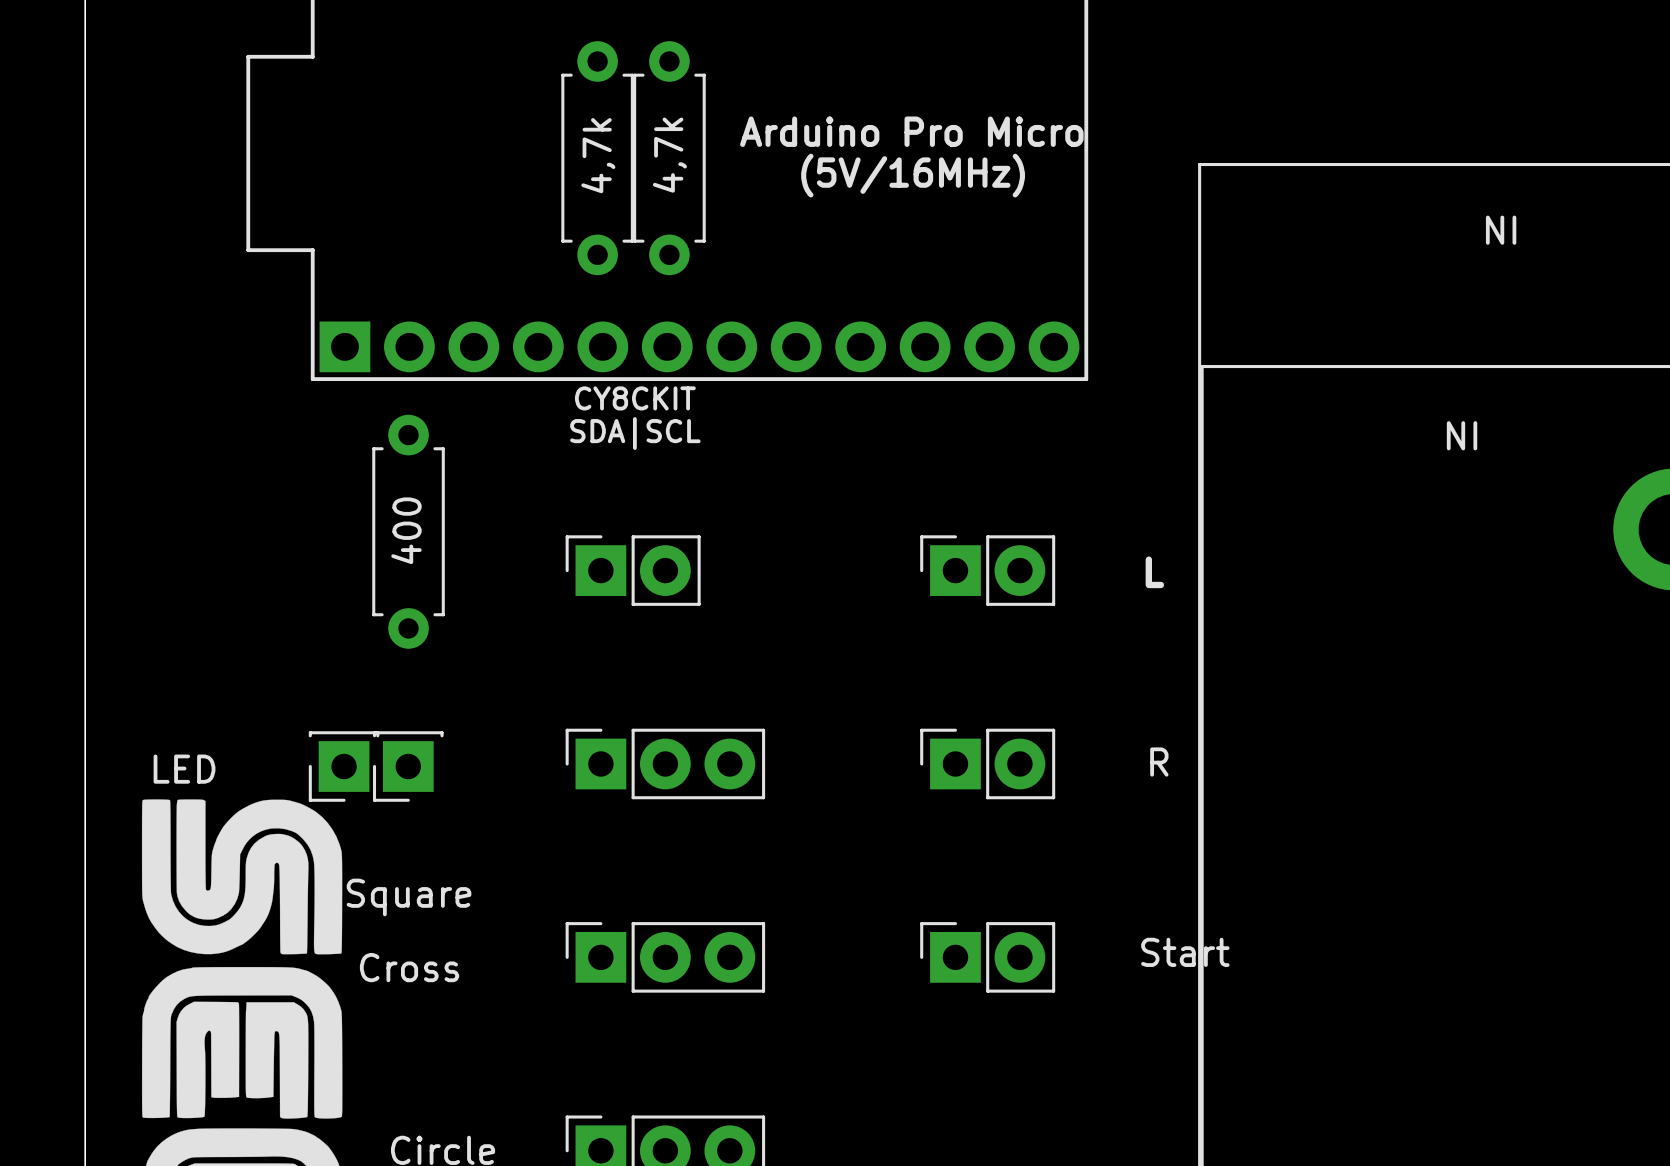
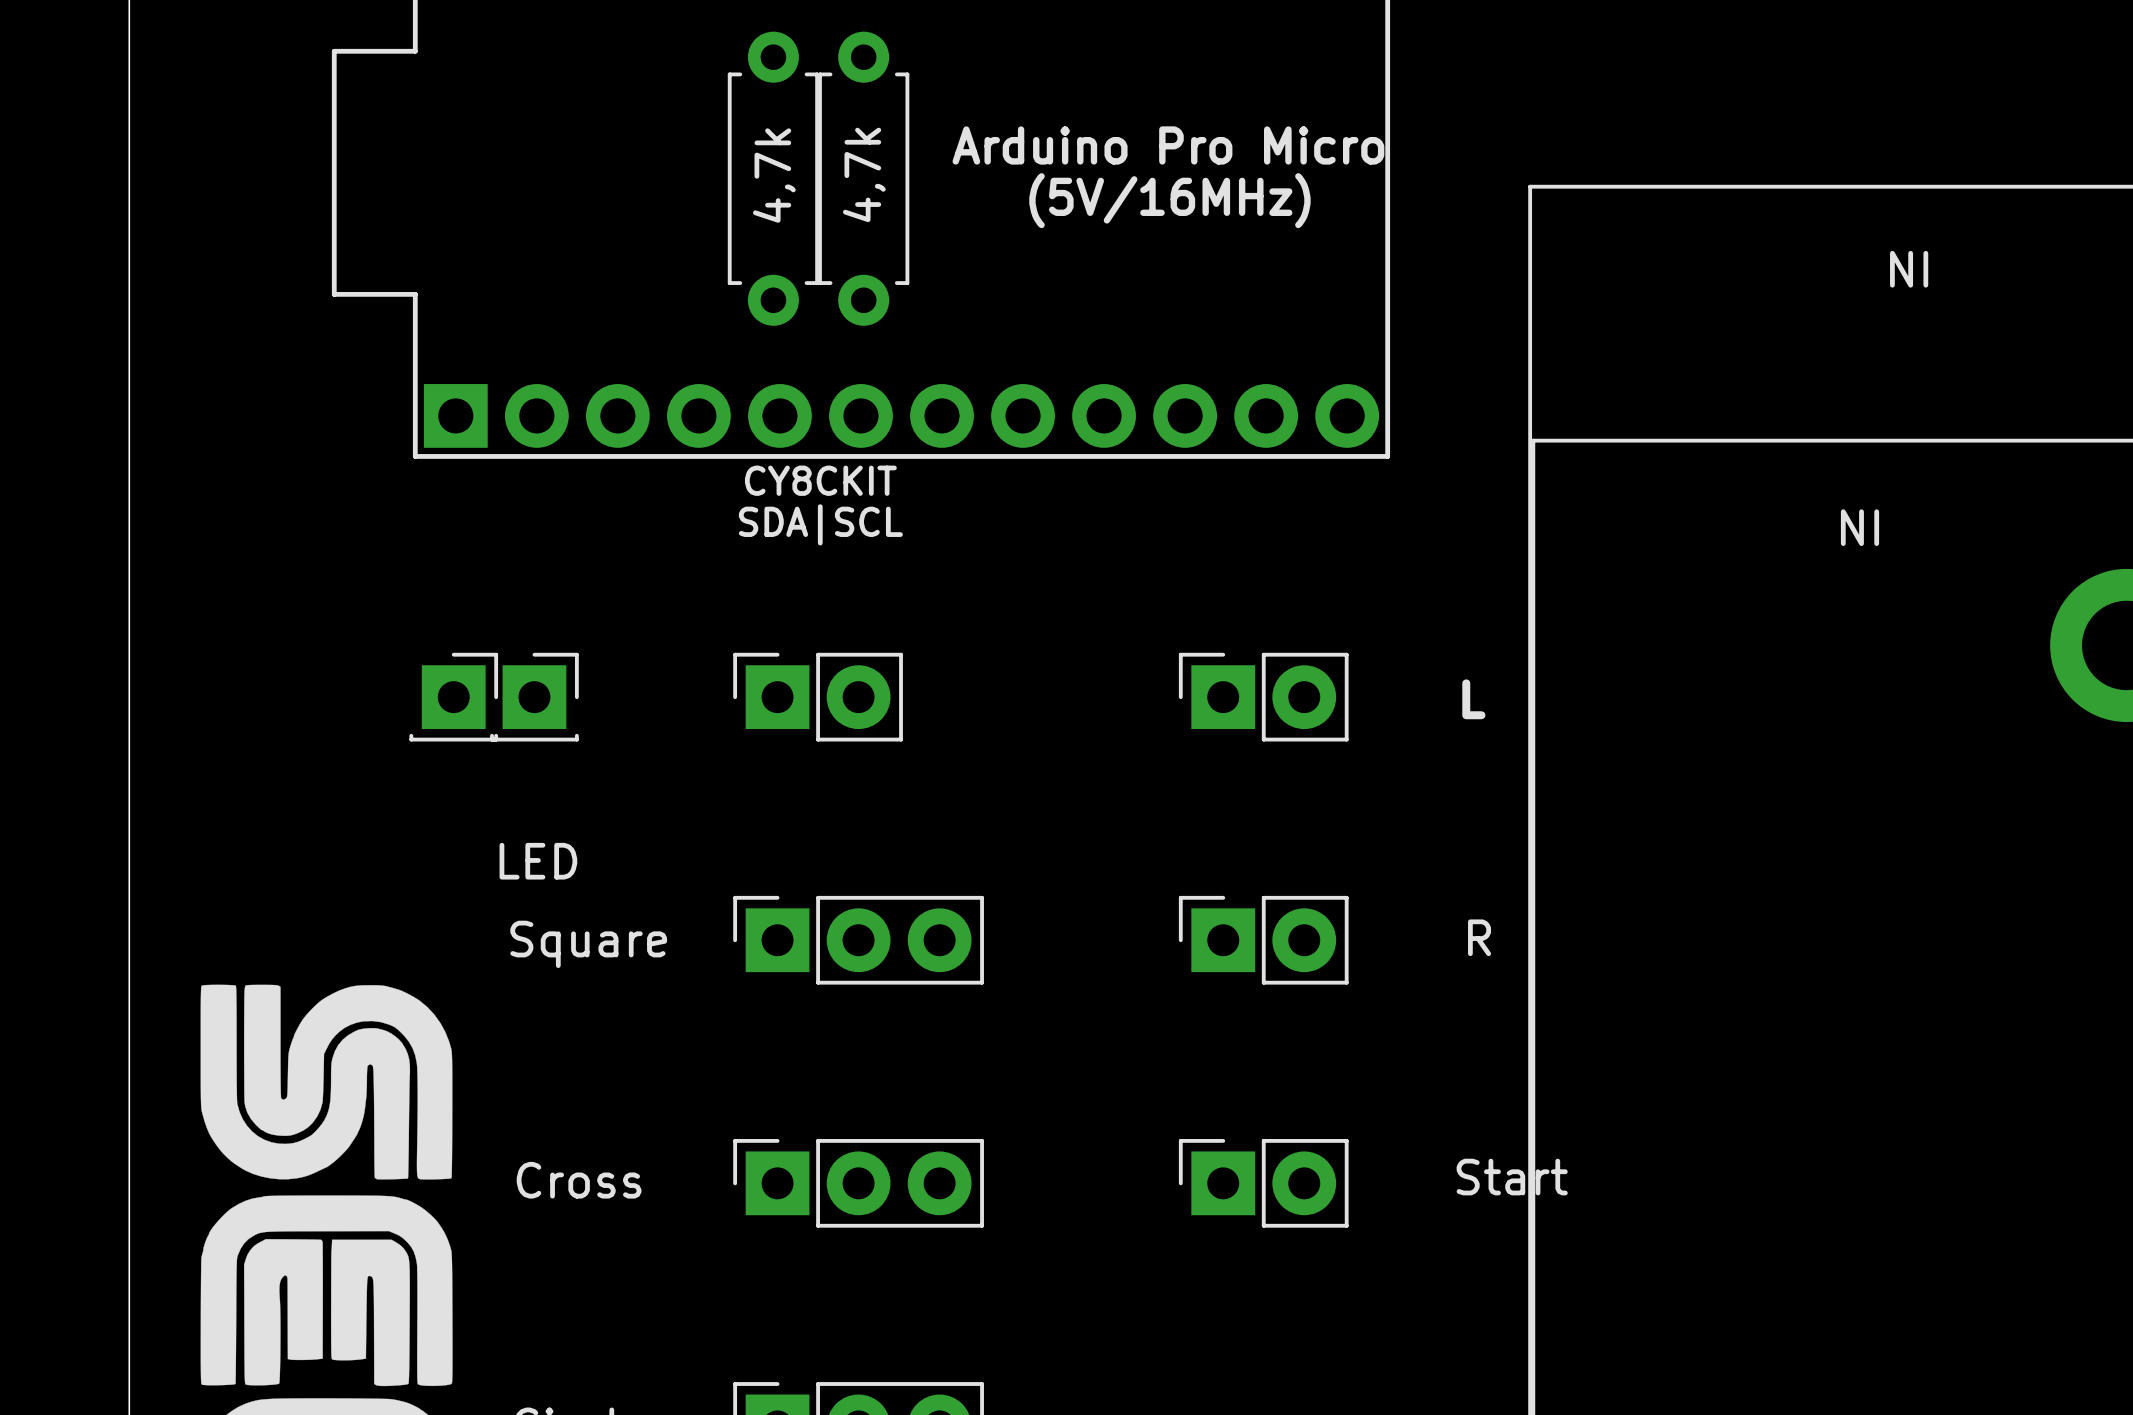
400: (408, 531) -> none
LED rotation: 0° (344, 766) -> 180° (534, 697)
LED position: (344, 766) -> (534, 697)
part rotation: 0° (408, 766) -> 180° (453, 697)
part position: (408, 766) -> (453, 697)
LED name position: LED (184, 769) -> LED (538, 861)
Square name position: Square (409, 897) -> Square (588, 944)
Cross name position: Cross (409, 967) -> Cross (579, 1180)

